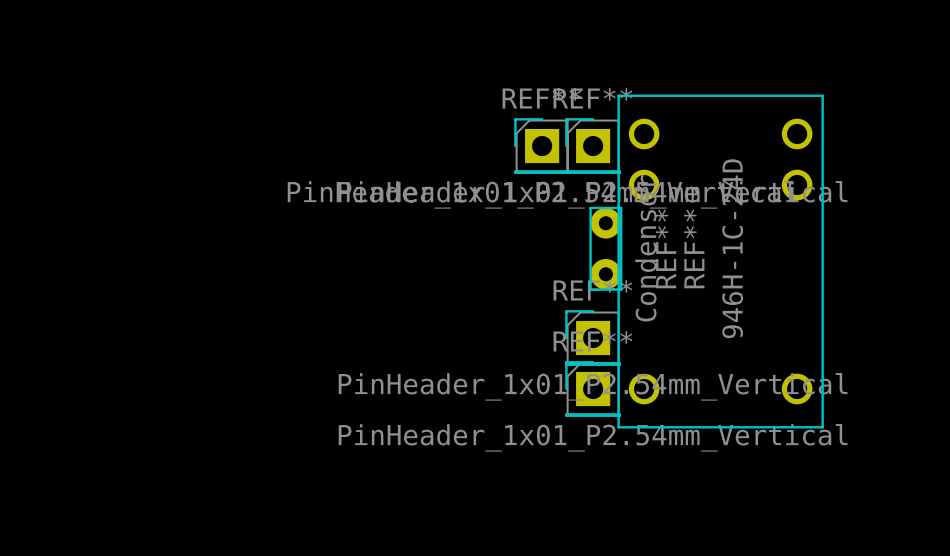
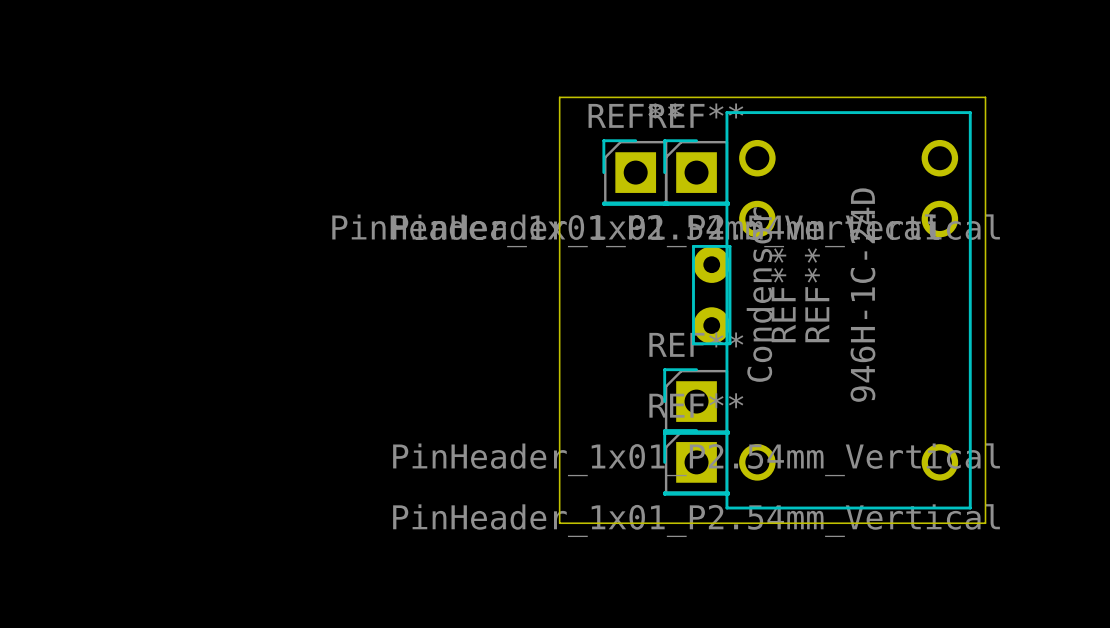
board edge: none -> (559, 97) (559, 523) (985, 523) (985, 97) (559, 97)

